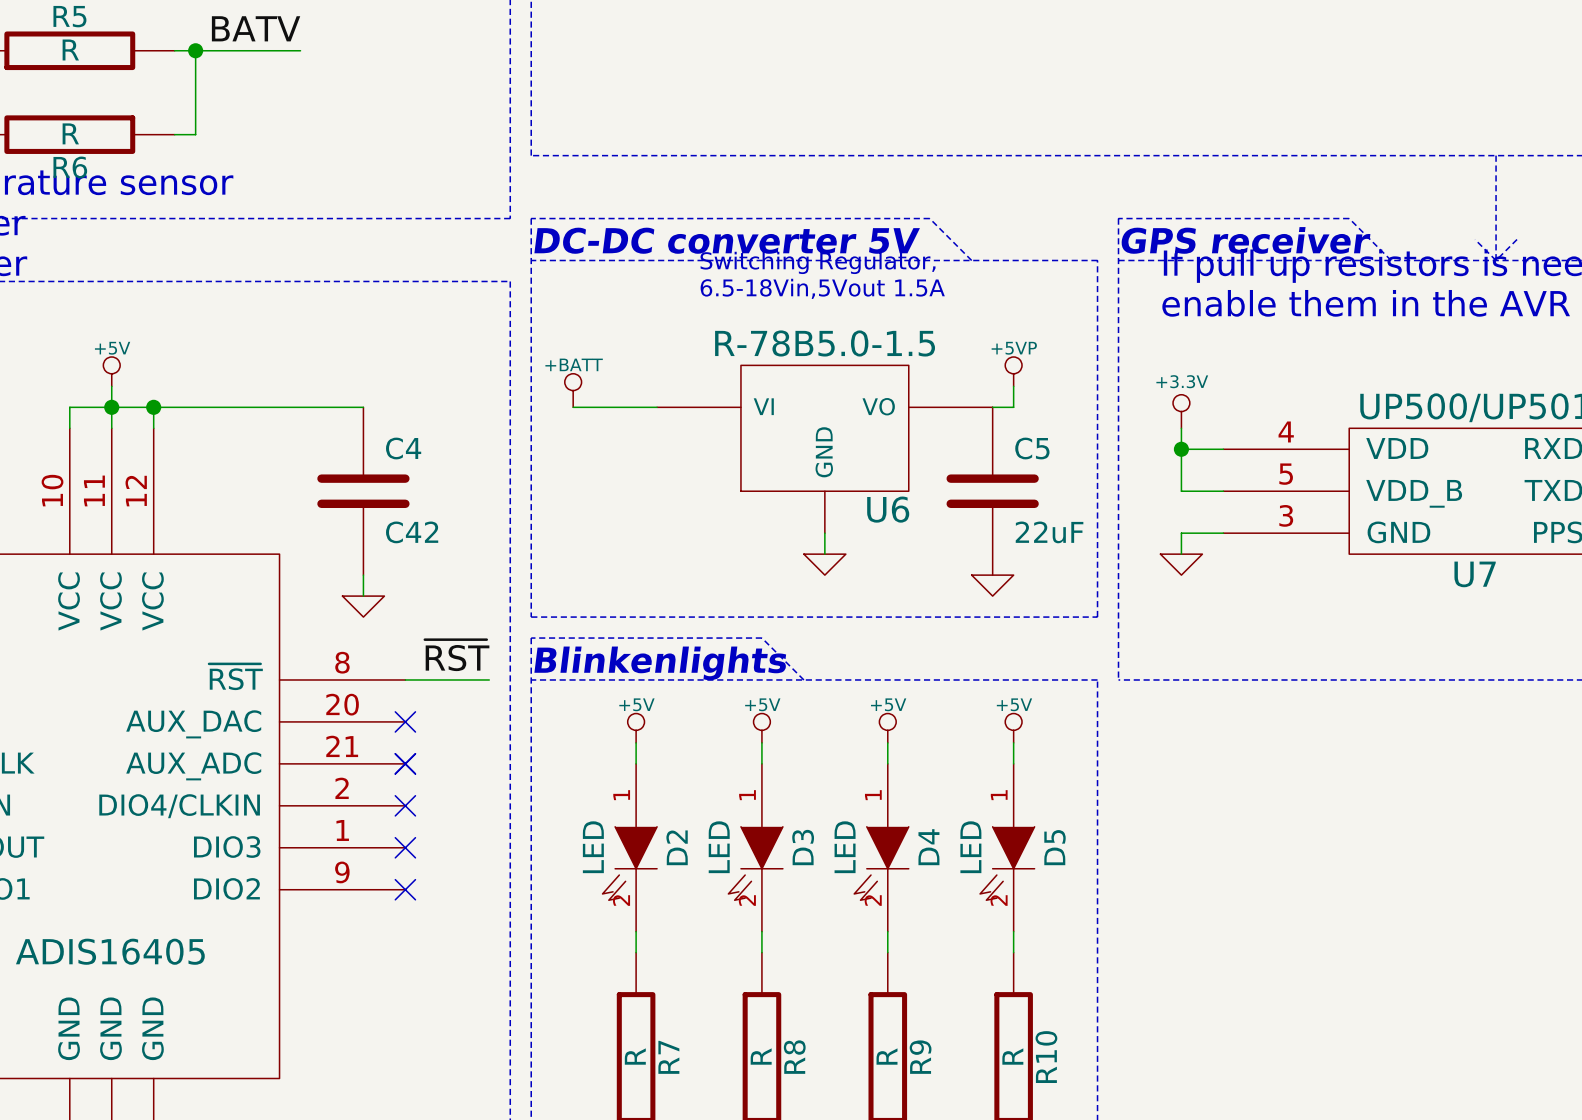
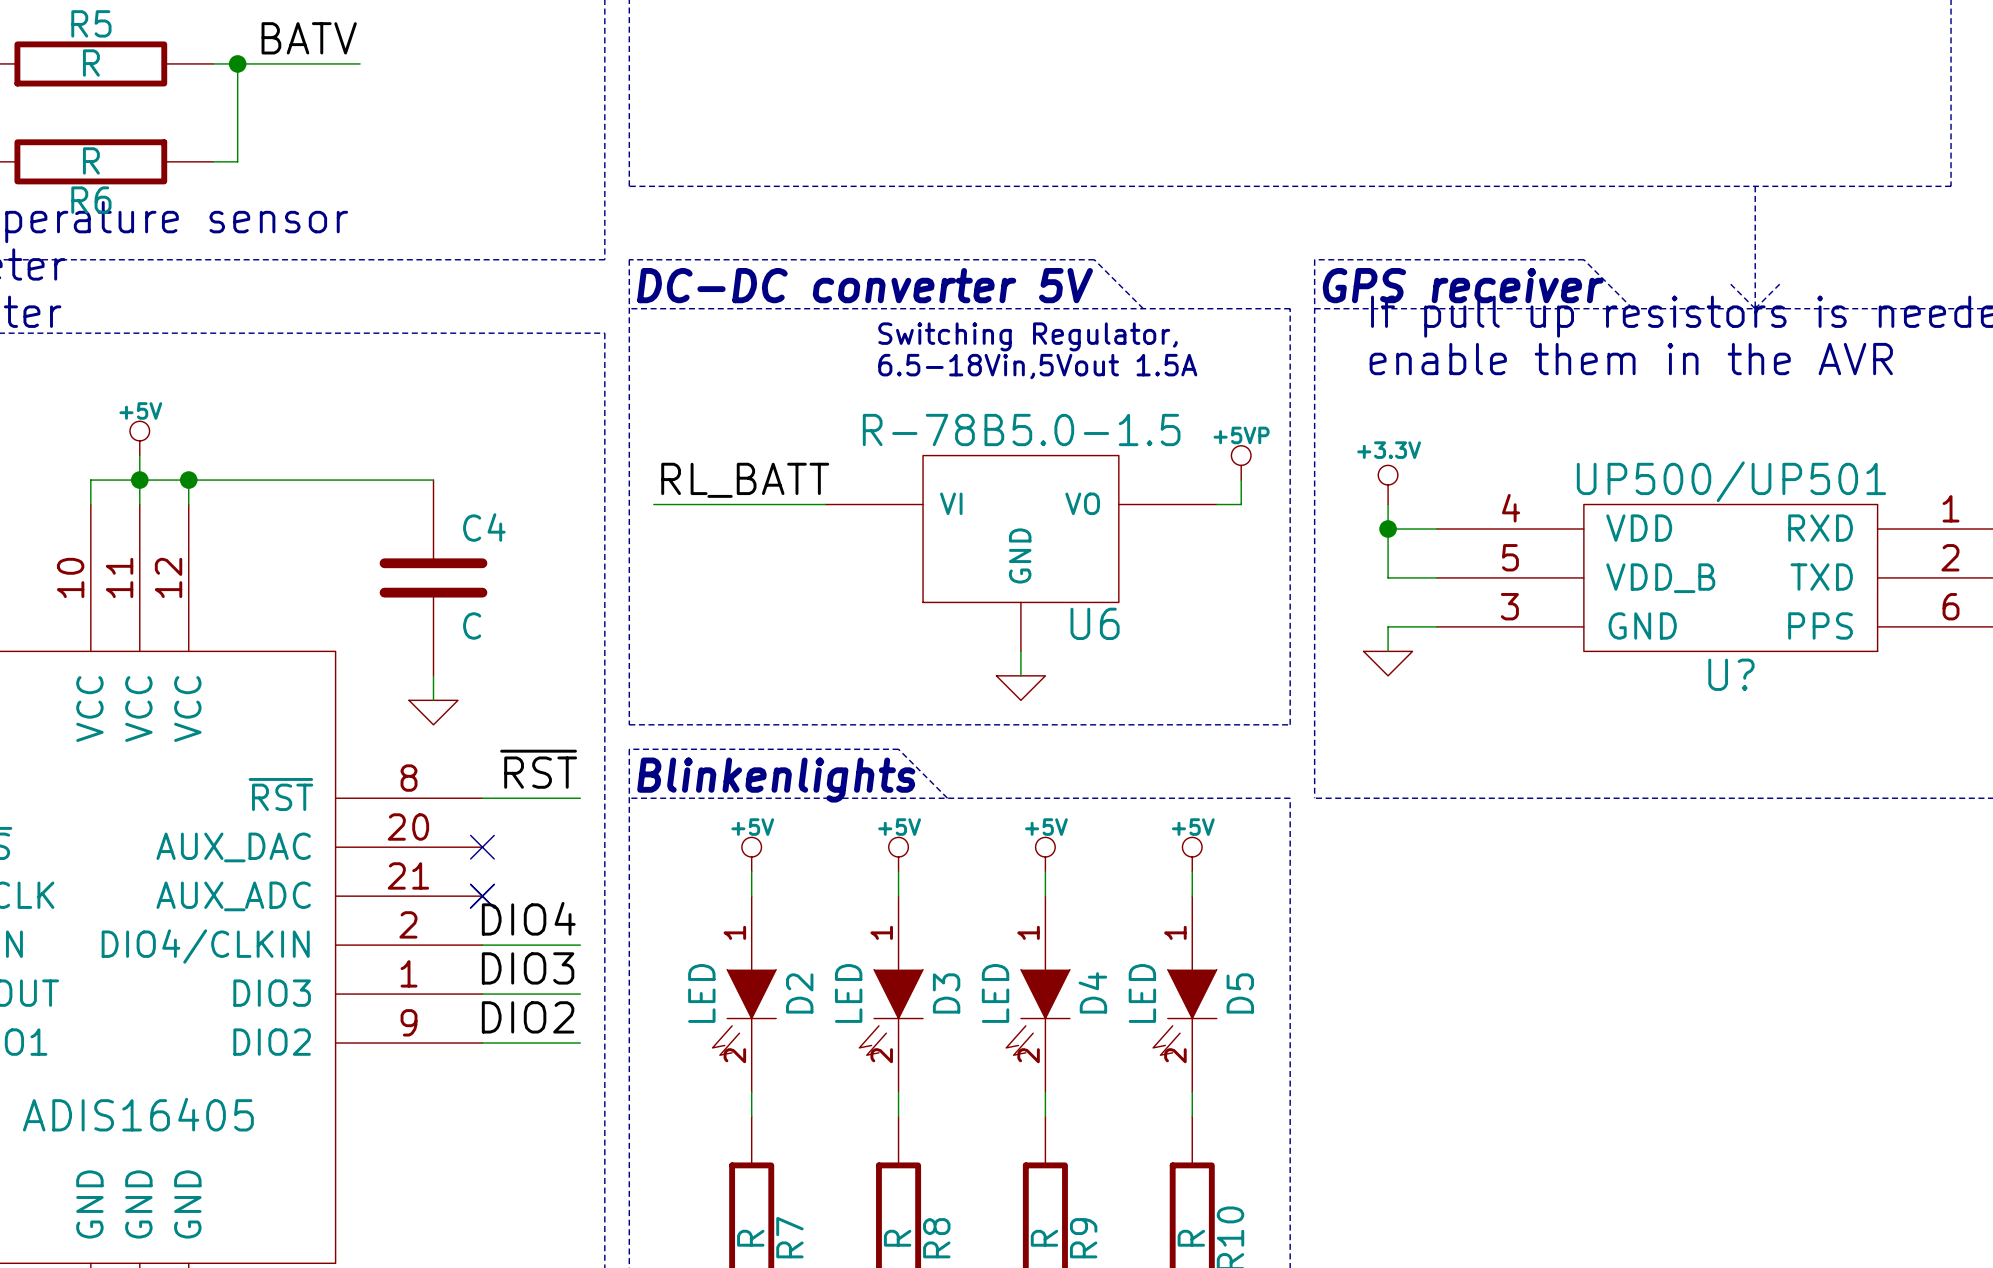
text position: Switching Regulator, (818, 262) -> Switching Regulator, (1027, 336)
text position: 6.5-18Vin,5Vout 1.5A (822, 288) -> 6.5-18Vin,5Vout 1.5A (1037, 366)
power symbol position: +5VP (1013, 371) -> +5VP (1241, 462)
wire: (1013, 386) (1013, 407) (992, 407) -> (1241, 480) (1241, 504) (1216, 504)
power symbol: +BATT (573, 390) -> none
wire: (573, 407) (657, 407) -> none
label: none -> RL_BATT (745, 480)
wire: none -> (653, 504) (825, 504)
U6 position: (824, 449) -> (1020, 553)
C5: 22uF (992, 491) -> none
C4 value: C42 (412, 532) -> C (472, 625)
wire: (824, 533) (824, 554) -> (1020, 651) (1020, 675)
power symbol position: (824, 564) -> (1020, 688)
U7 name: U7 (1475, 574) -> U? (1731, 674)
power symbol: (992, 585) -> none
label: none -> DIO4 (528, 918)
wire: none -> (482, 945) (580, 945)
no-connect mark: (405, 805) -> none
label: none -> DIO3 (528, 968)
wire: none -> (482, 994) (580, 994)
no-connect mark: (405, 847) -> none
label: none -> DIO2 (528, 1017)
wire: none -> (482, 1043) (580, 1043)
no-connect mark: (405, 889) -> none

